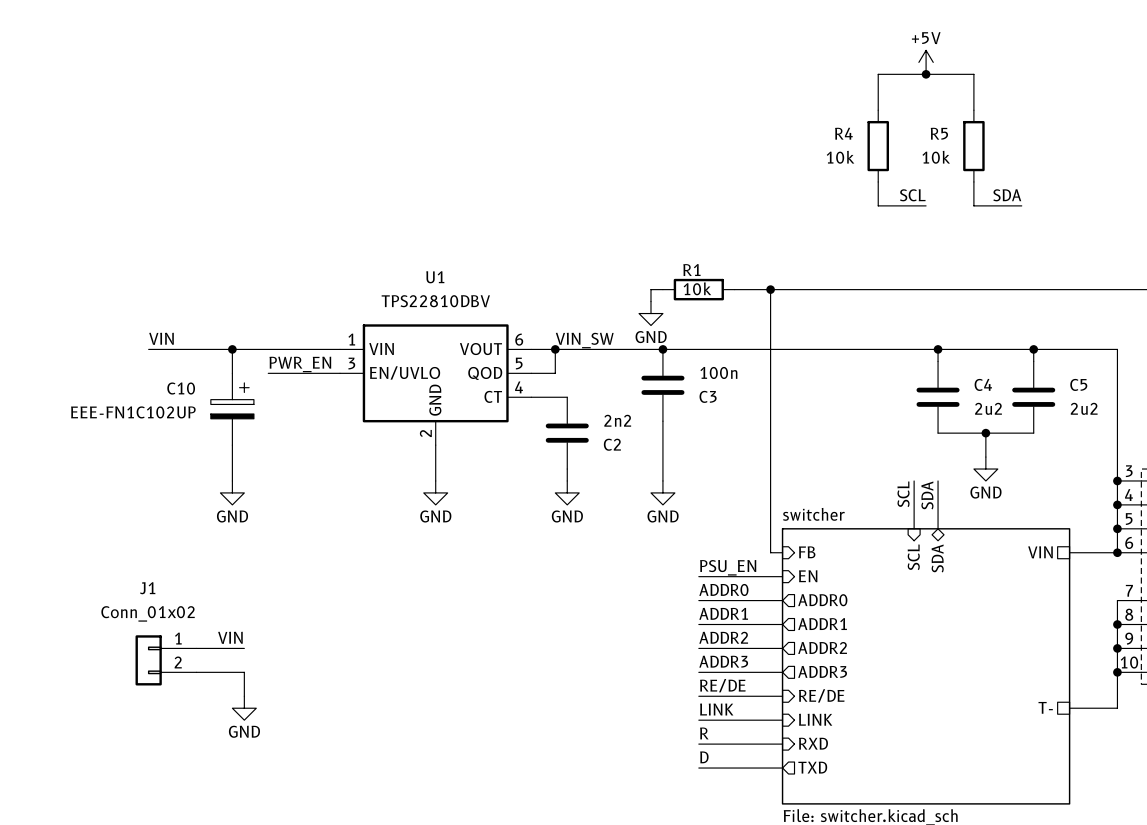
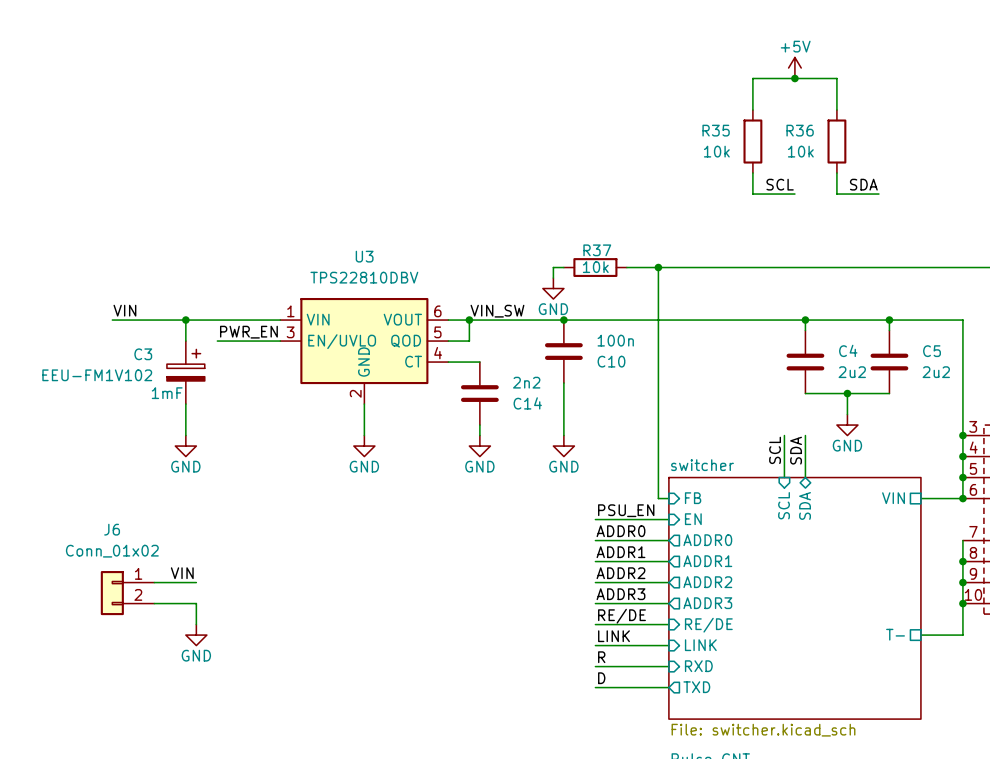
R4 name: R4 (843, 133) -> R35 (716, 130)
R5 name: R5 (939, 133) -> R36 (800, 130)
R1 name: R1 (691, 270) -> R37 (597, 250)
U1 name: U1 (435, 277) -> U3 (364, 256)
C10 name: C10 (181, 388) -> C3 (143, 354)
C3 name: C3 (708, 396) -> C10 (611, 361)
C10 value: EEE-FN1C102UP (133, 412) -> EEU-FM1V102 (97, 375)
C10 text: none -> 1mF (167, 393)
C2 name: C2 (612, 444) -> C14 (527, 403)
J1 name: J1 (147, 588) -> J6 (112, 529)

